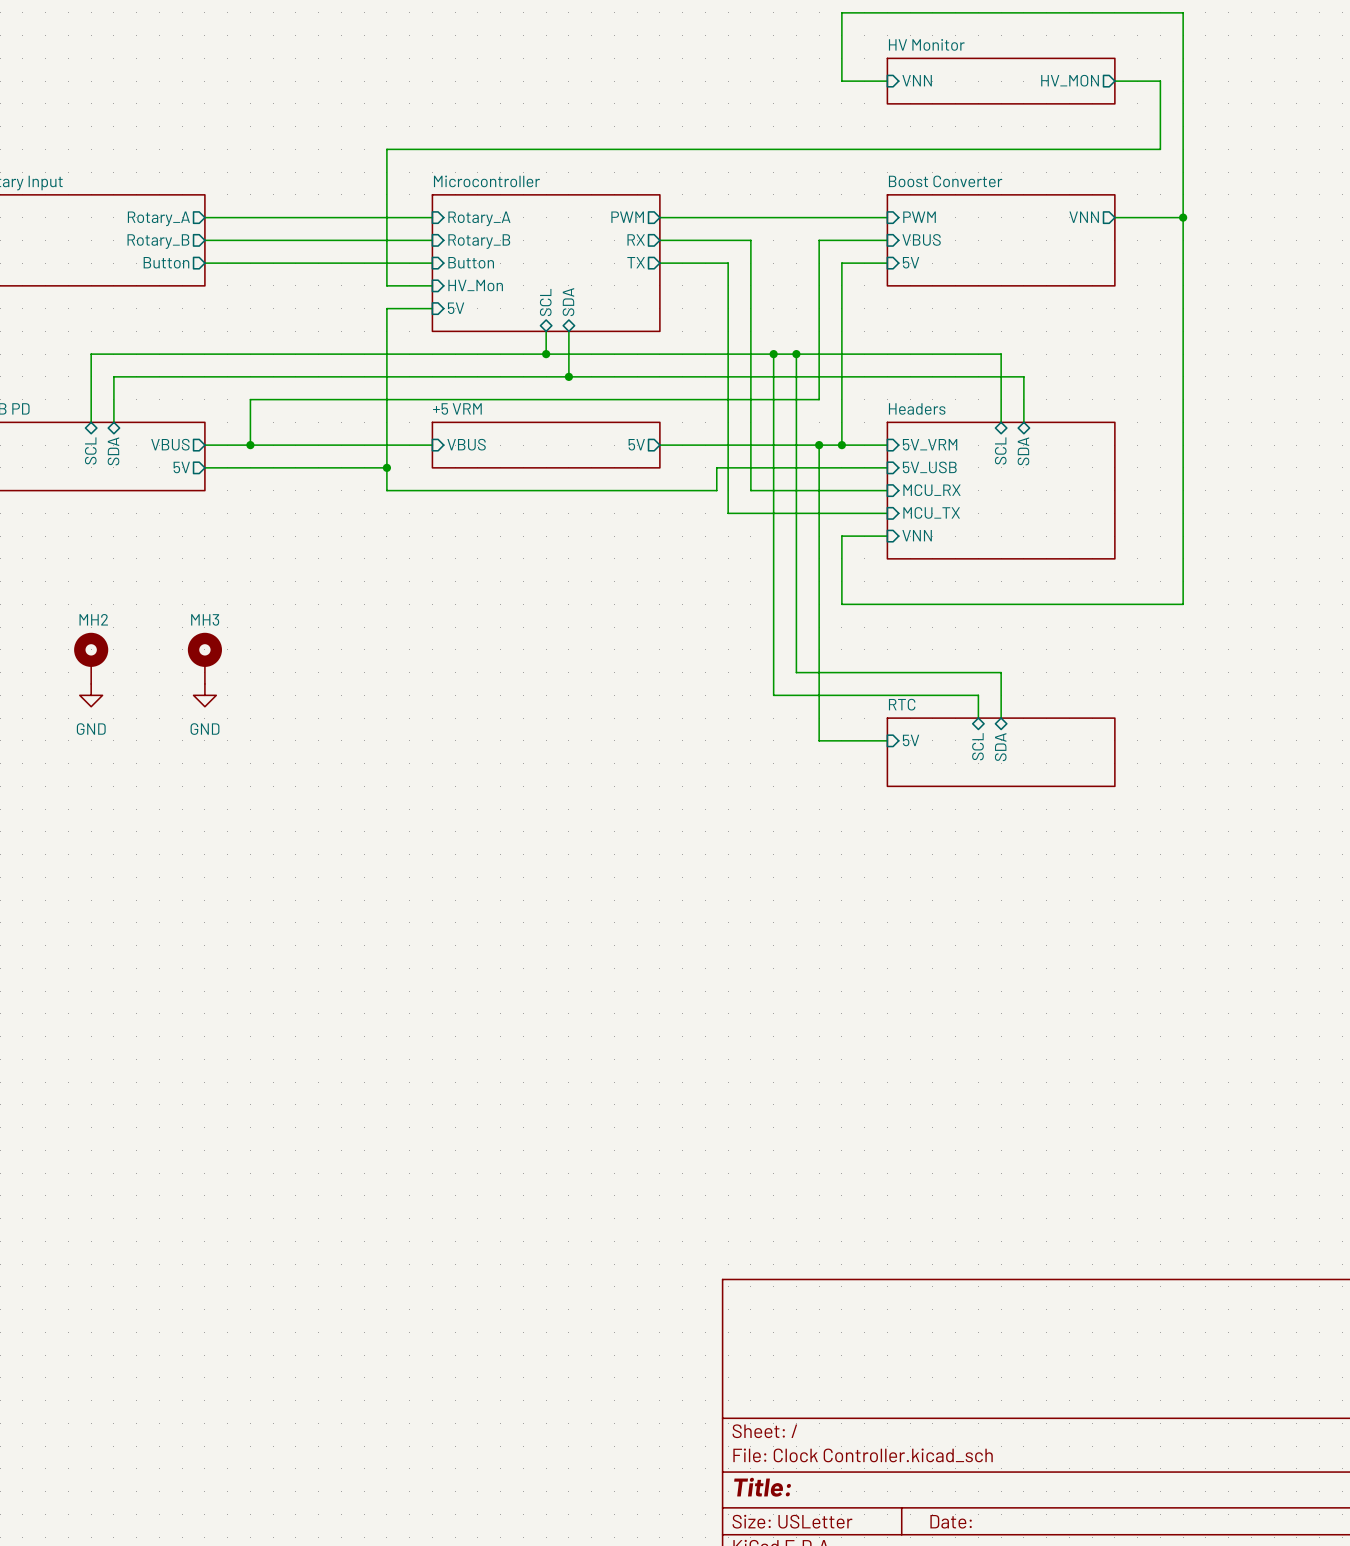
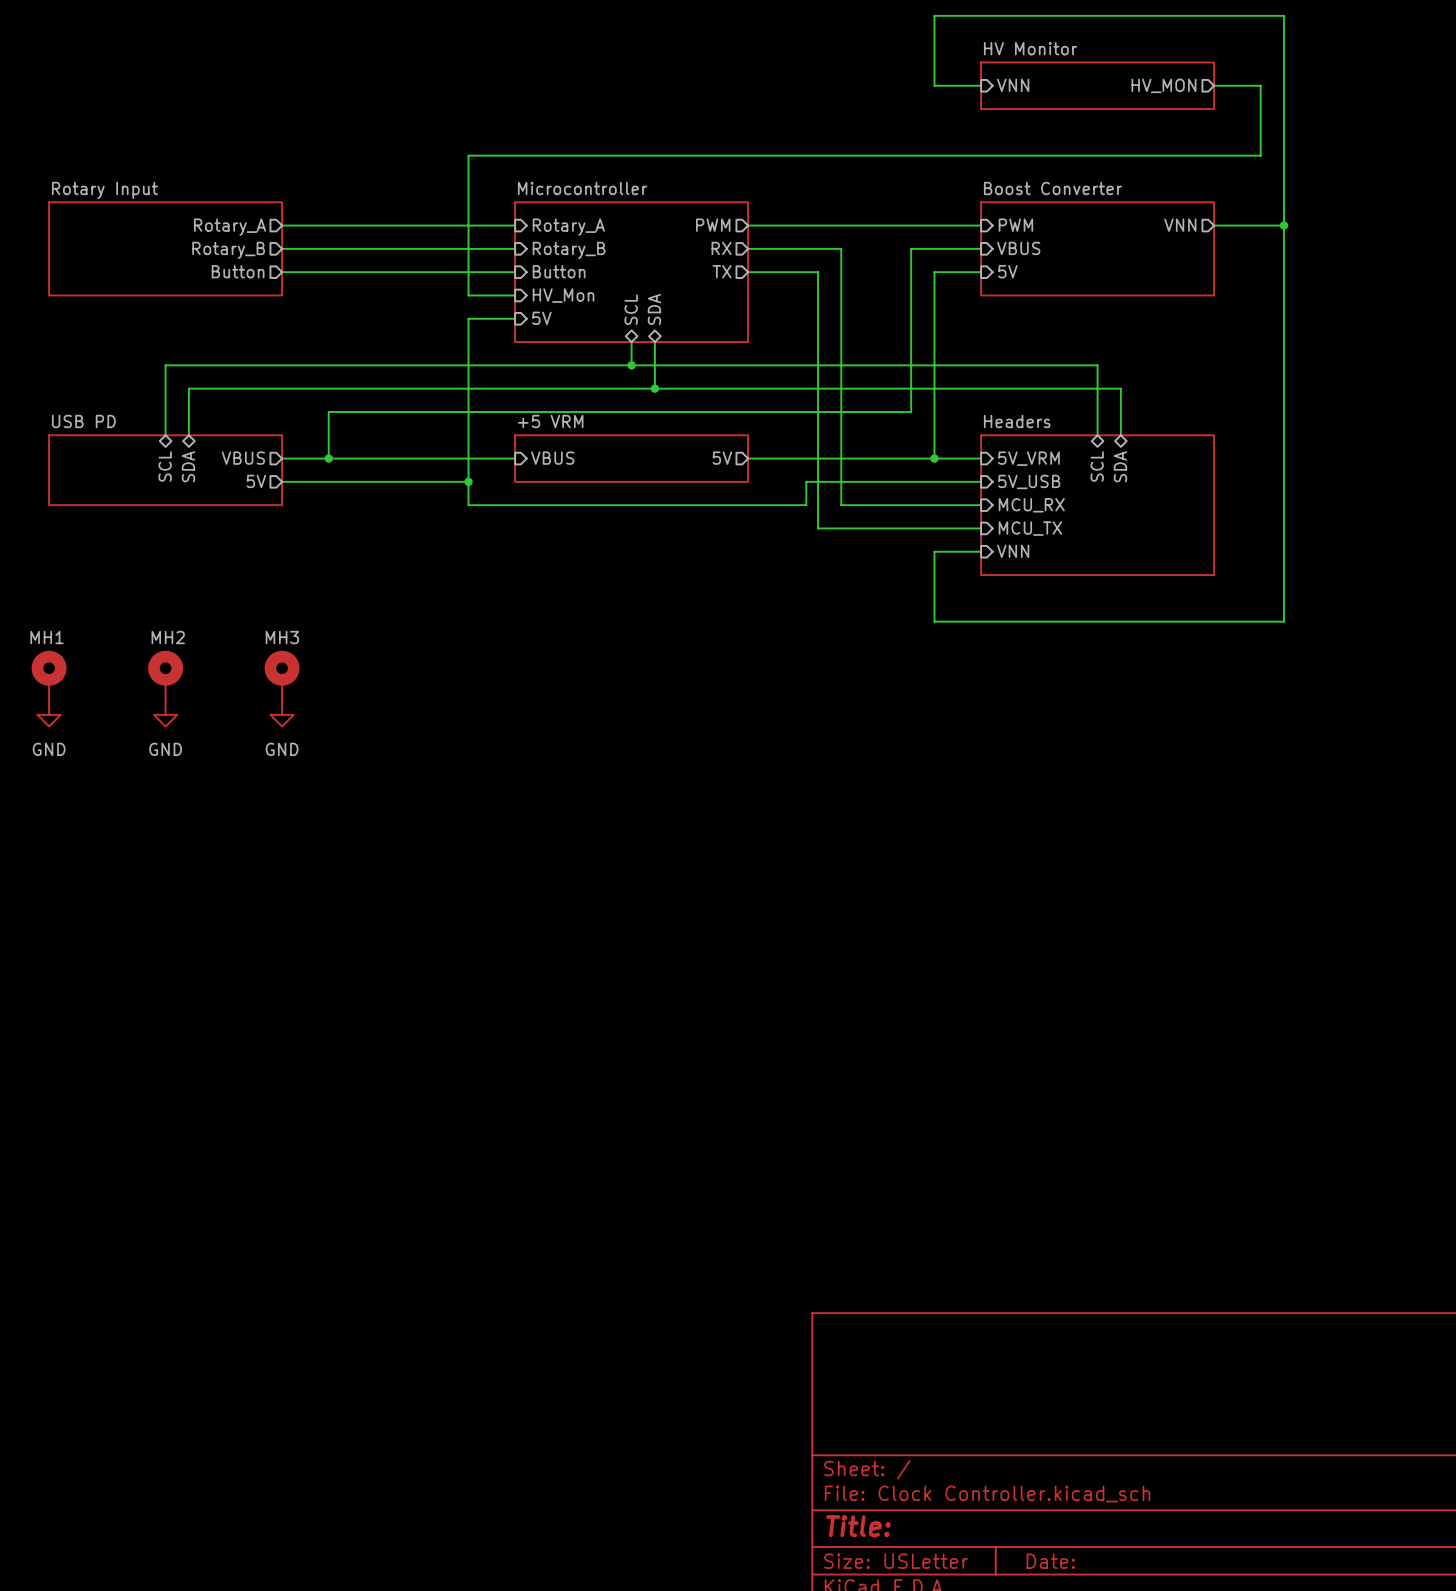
wire: (773, 354) (773, 695) (978, 695) (978, 718) -> none
junction: (773, 354) -> none
wire: (796, 354) (796, 672) (1001, 672) (1001, 718) -> none
junction: (796, 354) -> none
wire: (819, 445) (819, 740) (887, 740) -> none
junction: (819, 445) -> none
sheet pin: 5V (911, 740) -> none
sheet pin: SCL (977, 746) -> none
sheet pin: SDA (1000, 747) -> none
sheet RTC: (1001, 752) -> none

